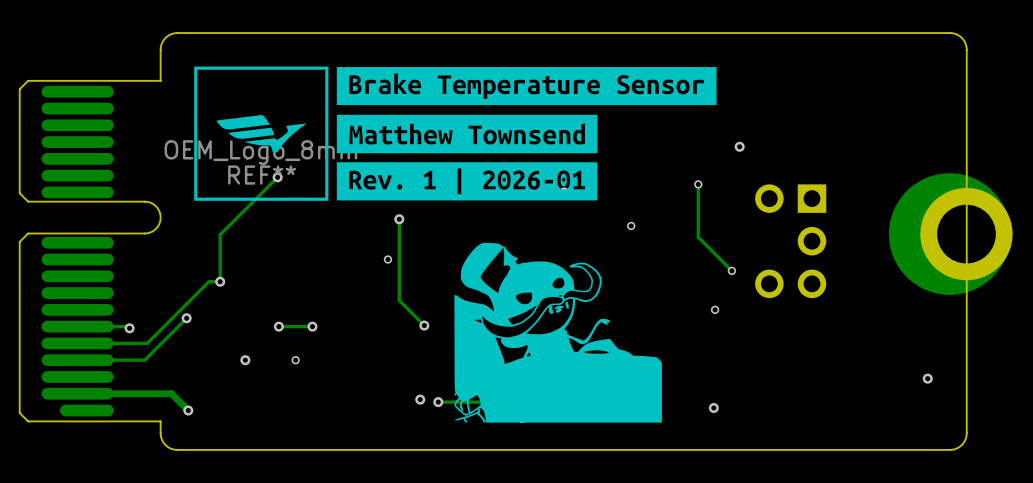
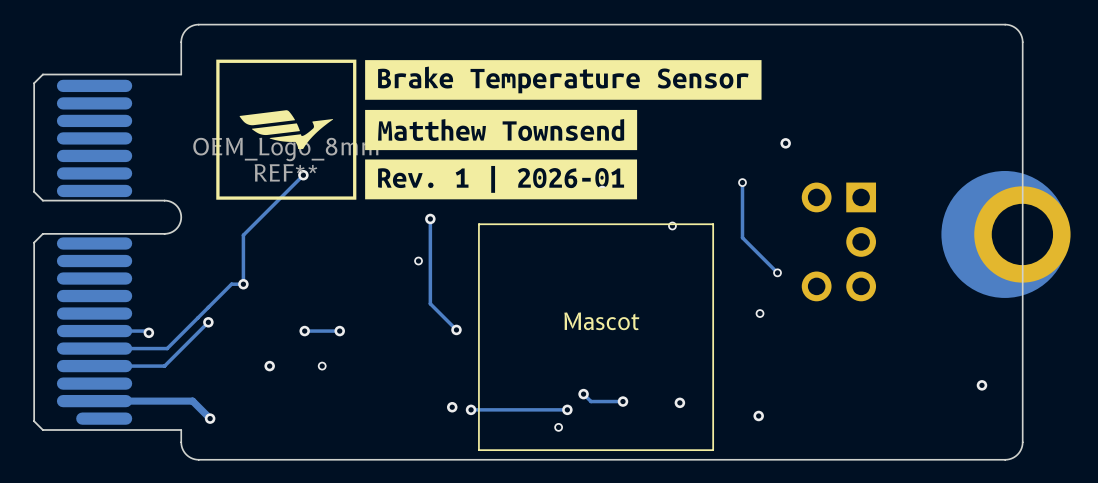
line: none -> (713, 224) (478, 224) (478, 450) (713, 450) (713, 224)
drawing: [454, 242, 662, 423] -> none
text: none -> Mascot (601, 321)

